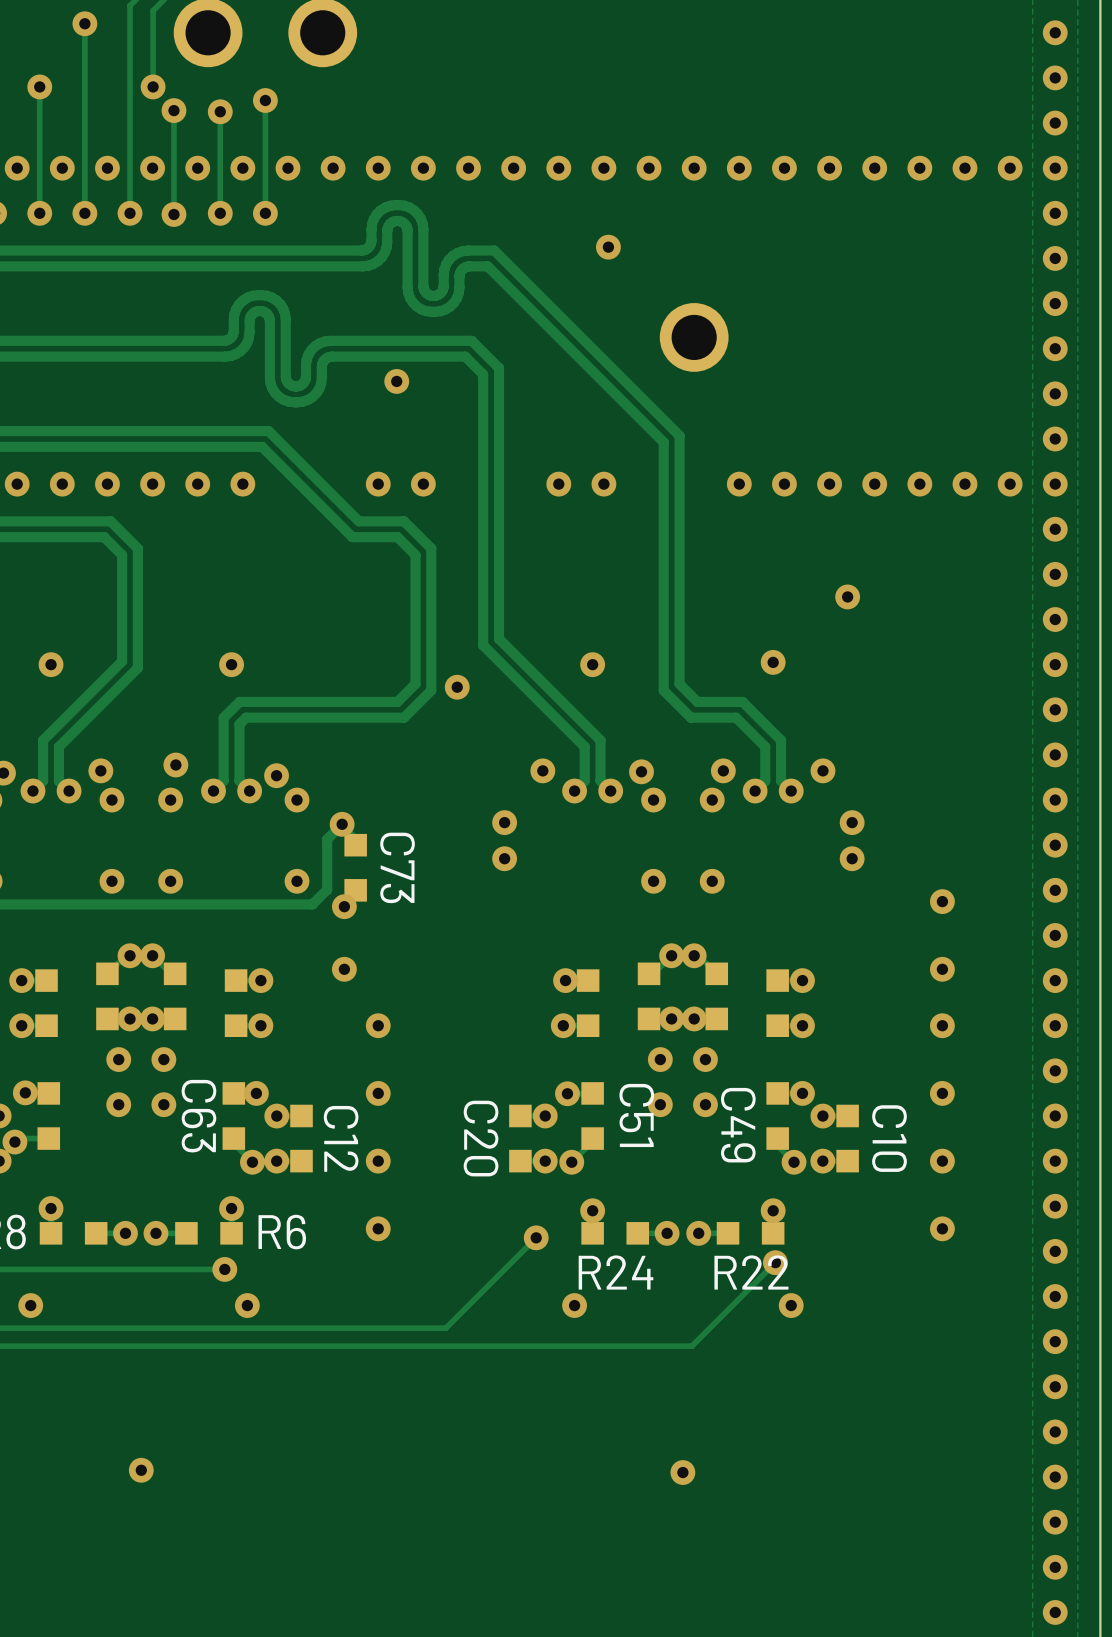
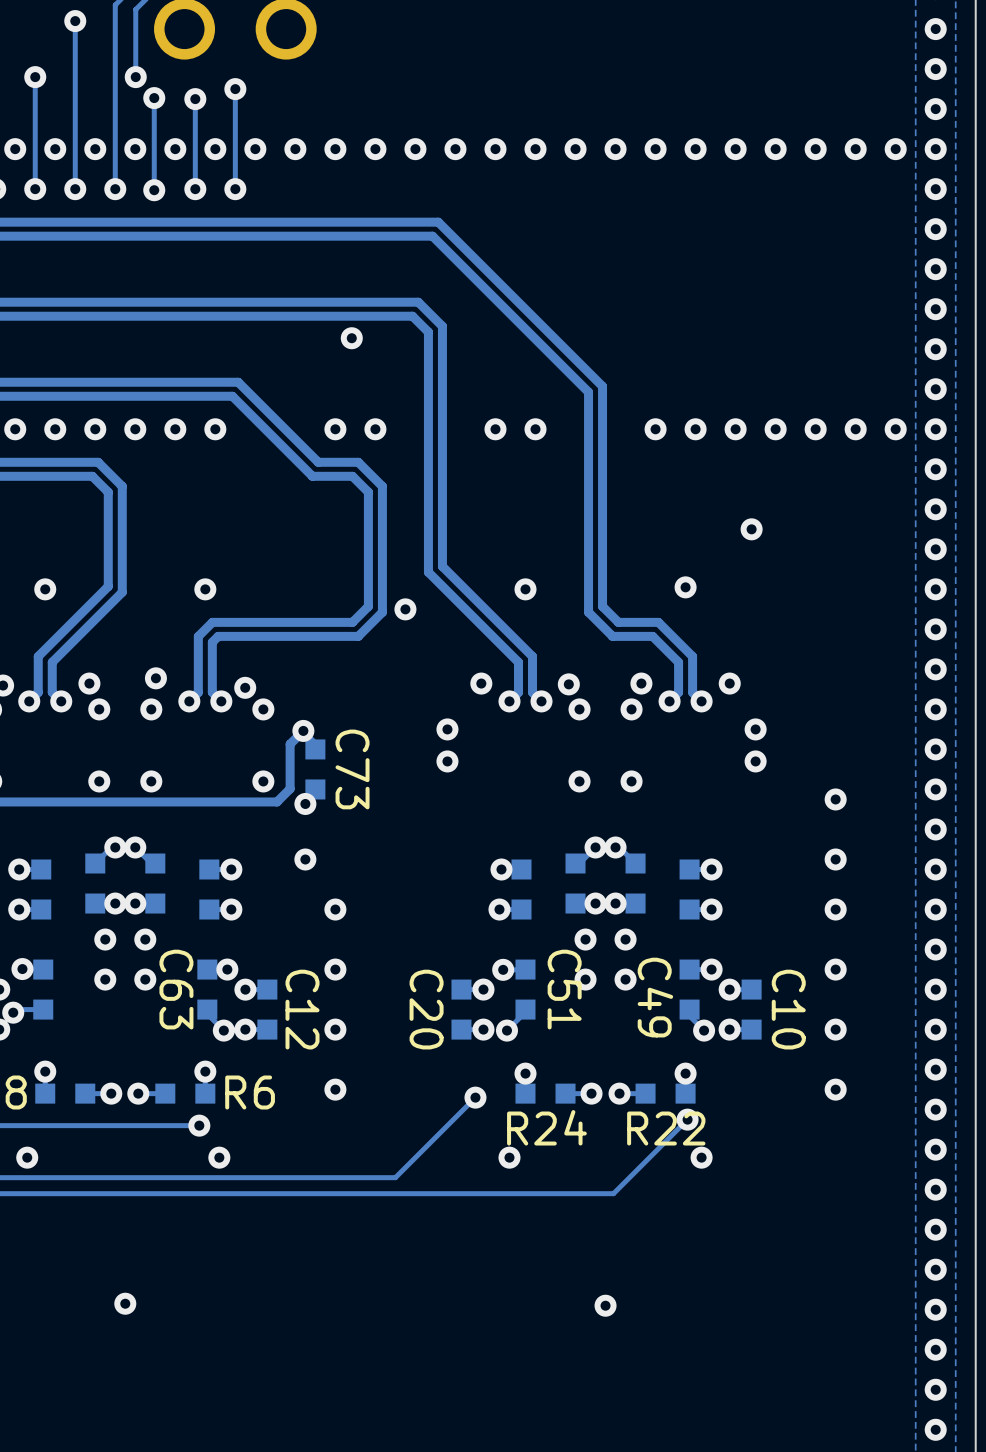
via: (608, 247) -> none
track: (468, 250) (457, 252) (449, 259) (444, 269) (442, 290) (433, 296) (427, 293) (423, 288) (422, 224) (414, 210) (398, 205) (390, 205) (380, 210) (372, 224) (370, 244) (361, 250) -> (415, 222) (320, 222)
track: (469, 266) (460, 272) (458, 292) (454, 302) (445, 309) (435, 311) (421, 309) (410, 297) (407, 287) (407, 231) (403, 223) (397, 220) (389, 224) (386, 247) (381, 257) (373, 263) (362, 266) -> (416, 236) (321, 236)
part: (694, 337) -> none
track: (330, 340) (319, 343) (311, 350) (306, 359) (303, 382) (295, 386) (289, 384) (285, 376) (285, 314) (276, 300) (261, 295) (247, 297) (239, 304) (234, 314) (232, 335) (223, 340) -> (293, 302) (198, 302)
track: (331, 356) (322, 362) (321, 383) (316, 393) (307, 399) (297, 402) (283, 399) (272, 388) (269, 377) (269, 321) (266, 313) (259, 310) (251, 314) (249, 337) (244, 347) (235, 354) (225, 356) -> (294, 316) (199, 316)

